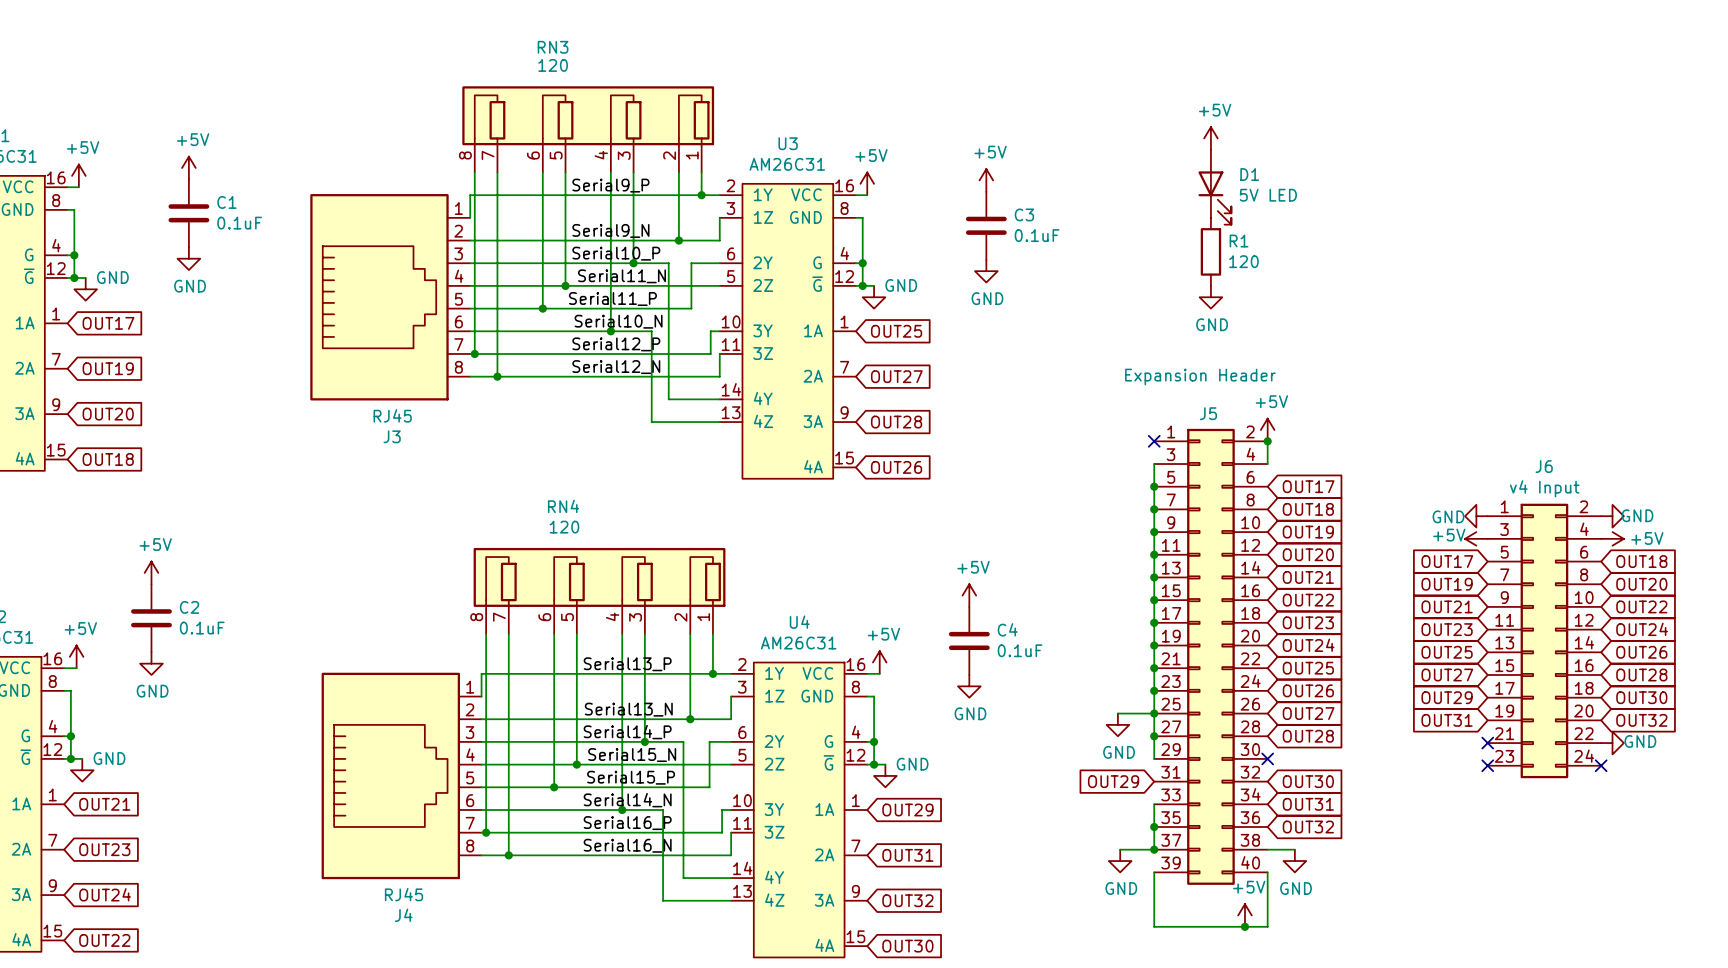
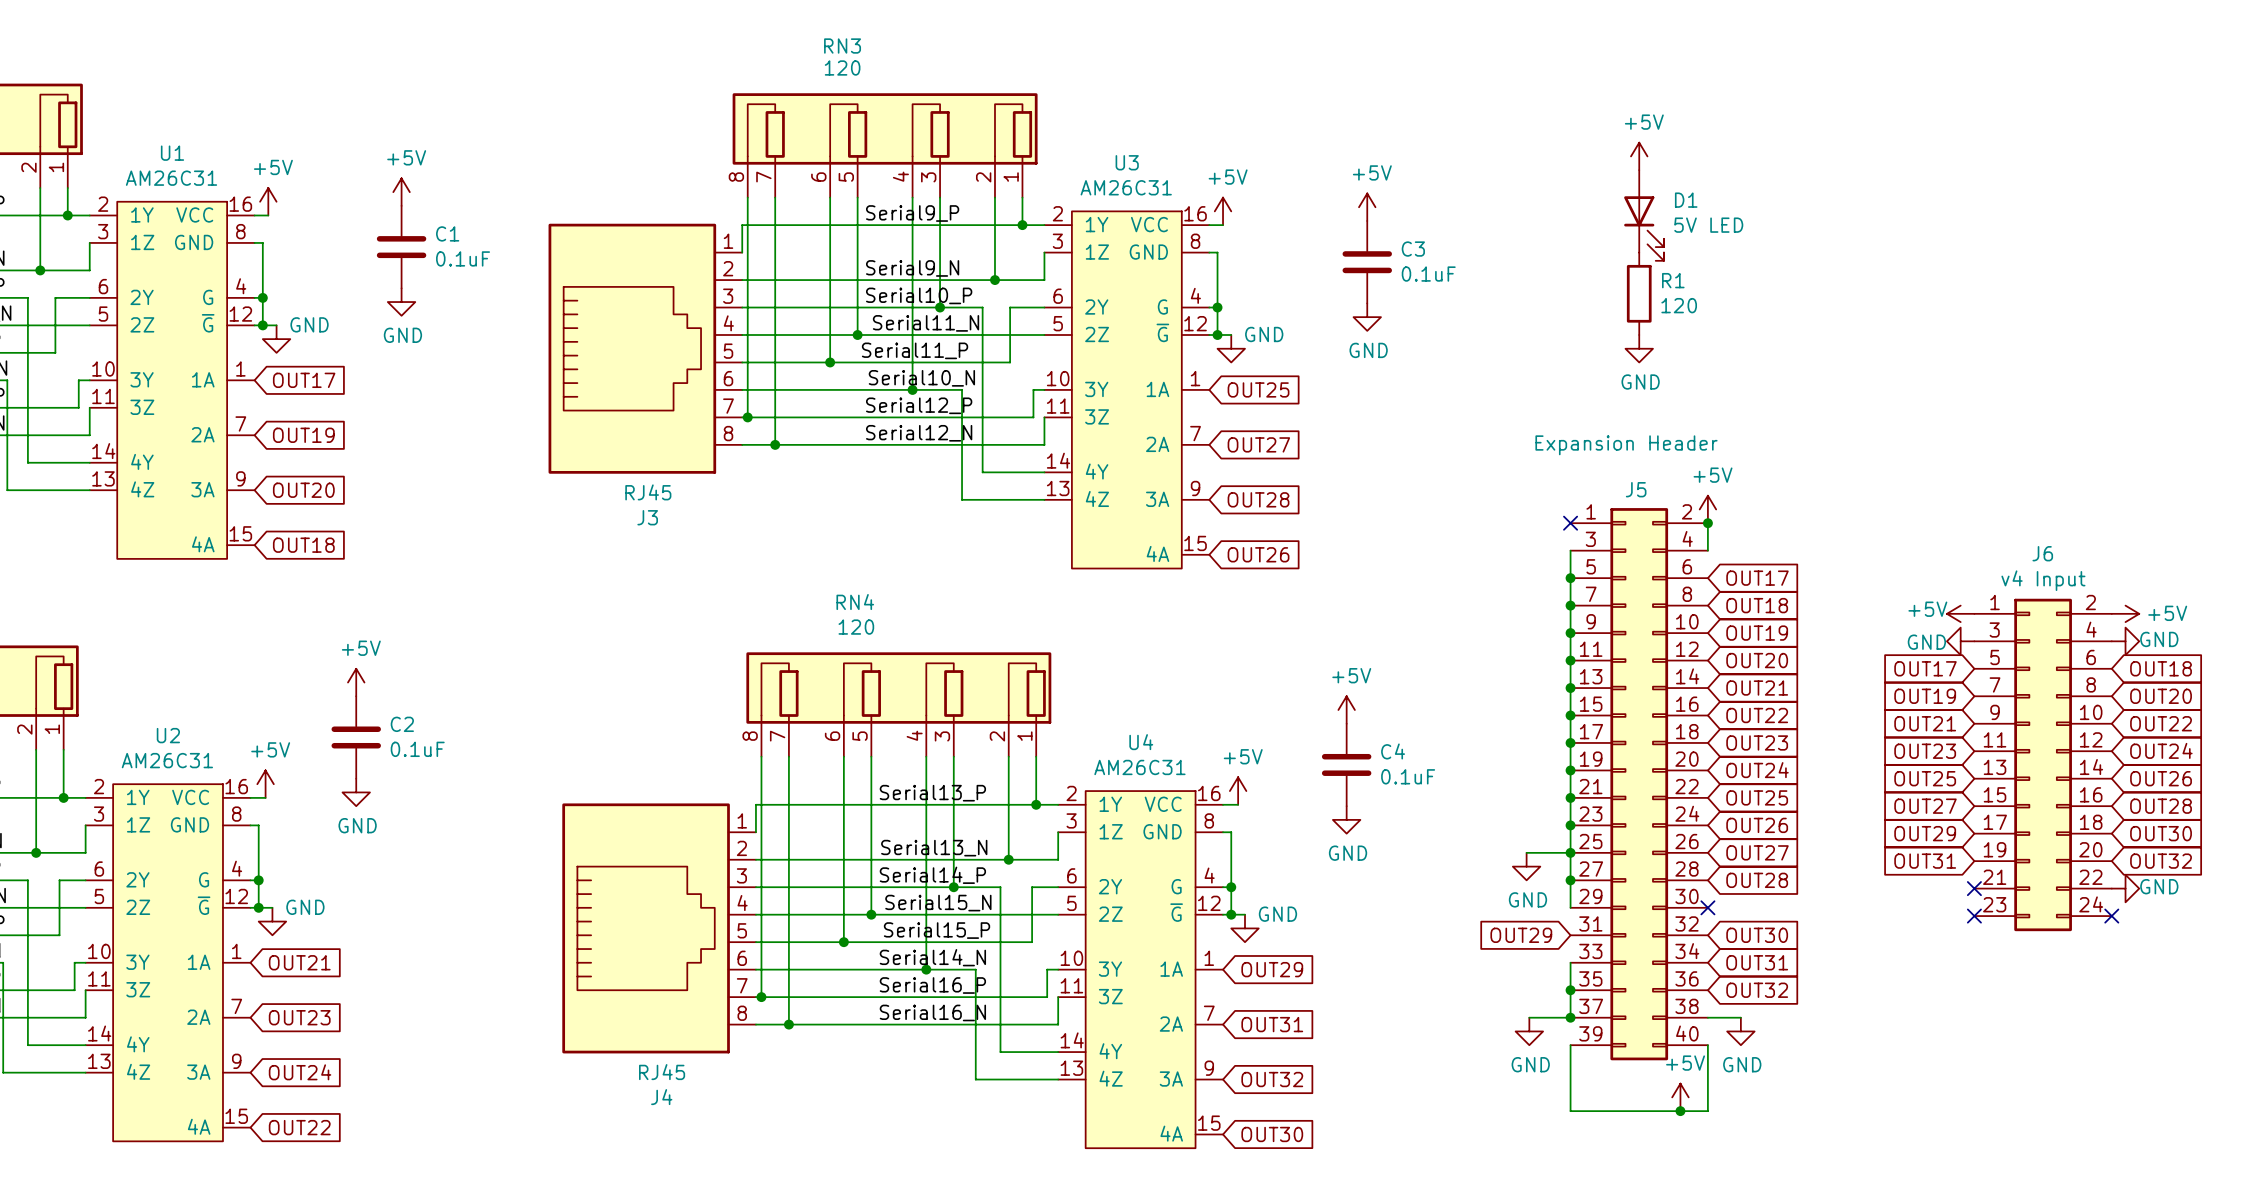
power symbol: GND (1476, 516) -> +5V (1960, 613)
power symbol: GND (1612, 516) -> +5V (2125, 613)
power symbol: +5V (1476, 538) -> GND (1960, 641)
power symbol: +5V (1612, 538) -> GND (2125, 641)

